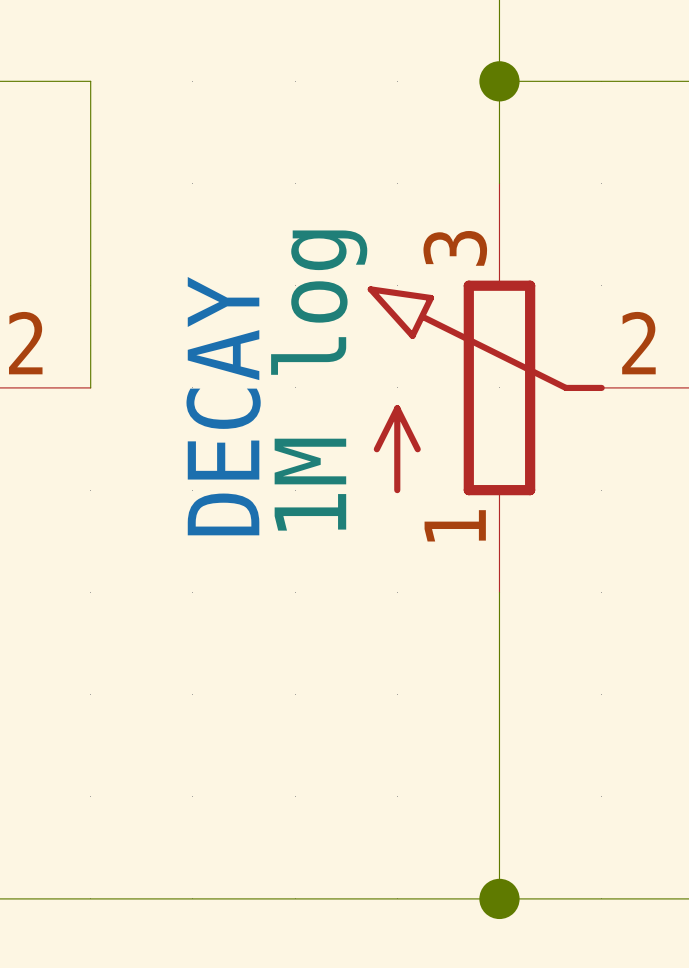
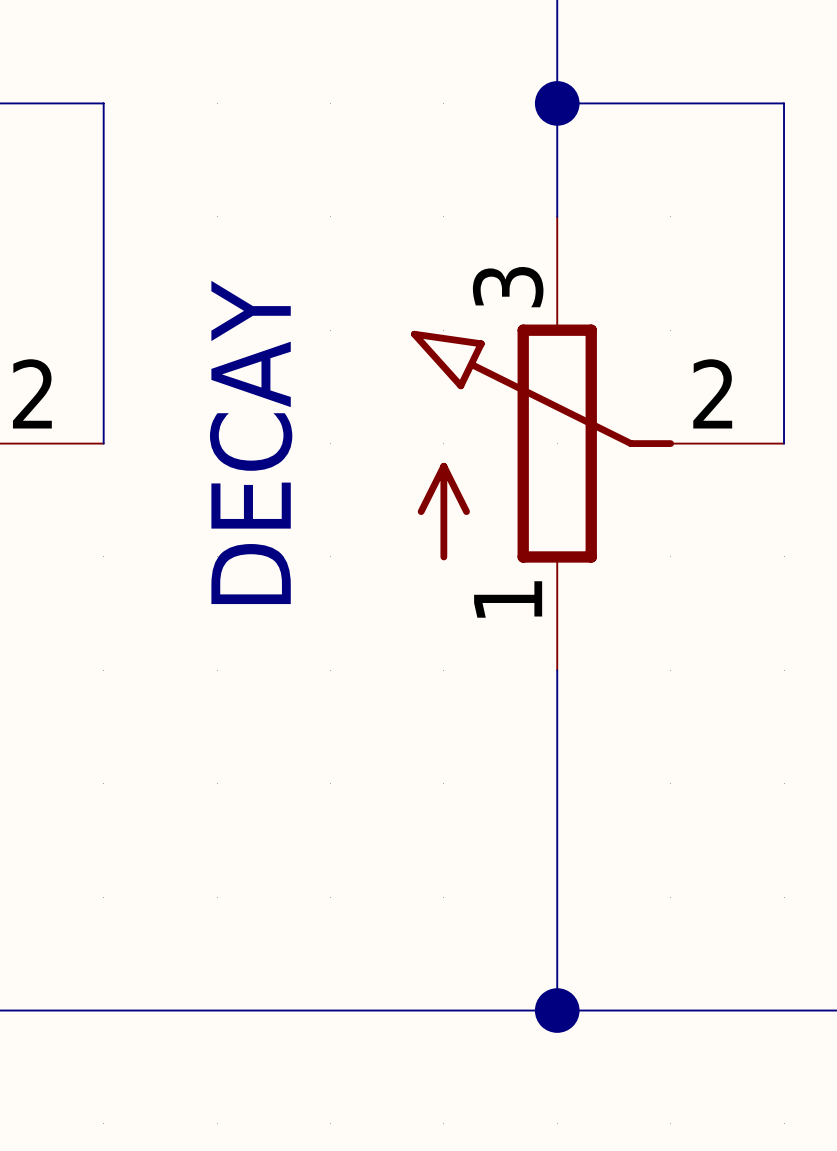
DECAY value: 1M log (319, 380) -> none

